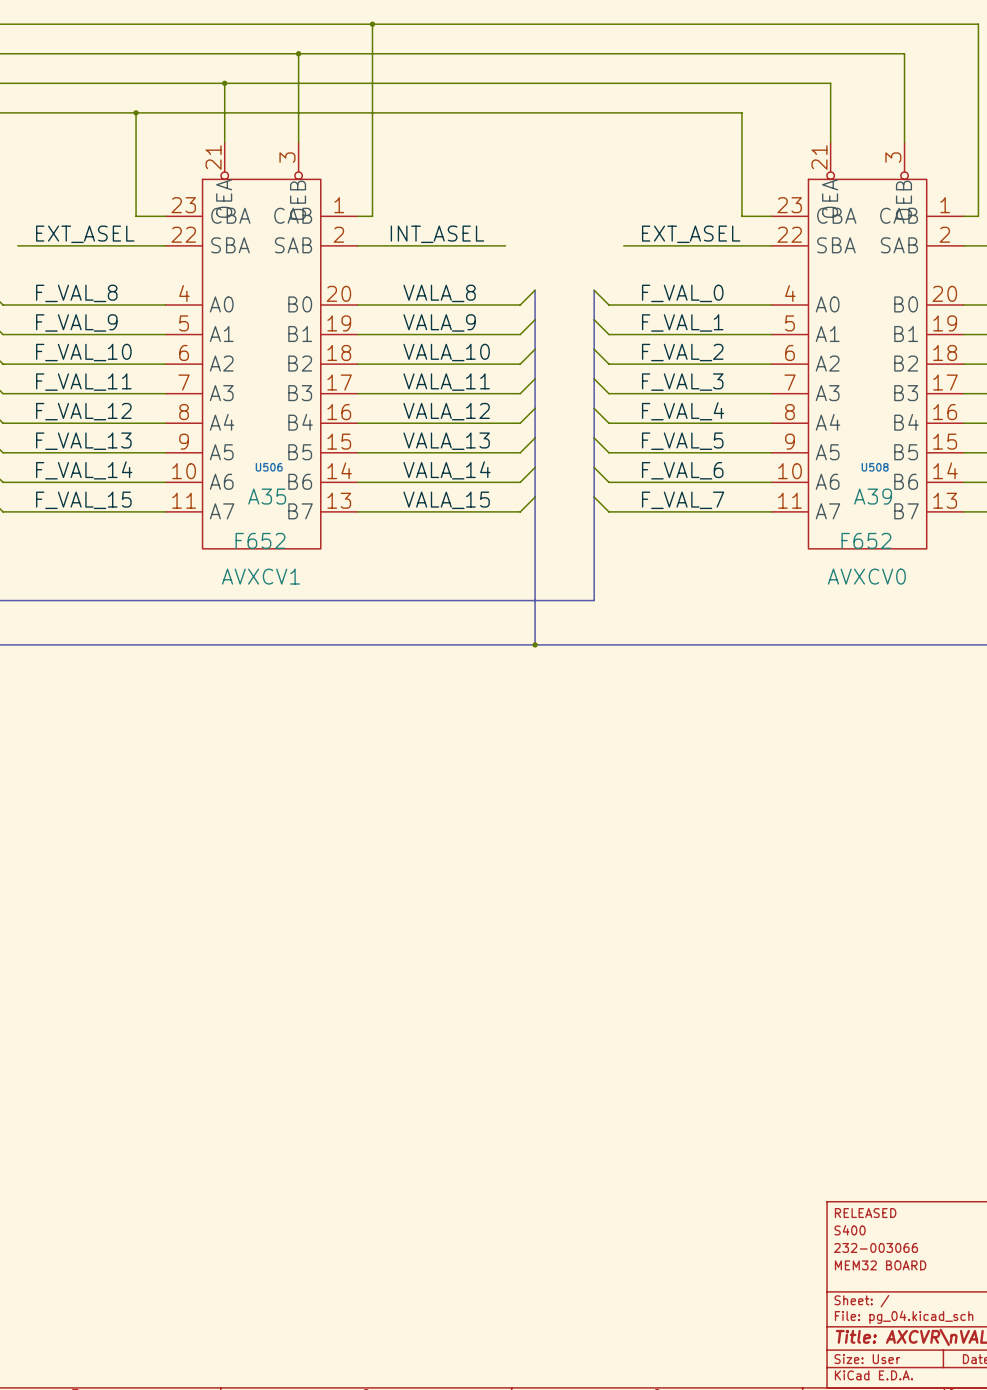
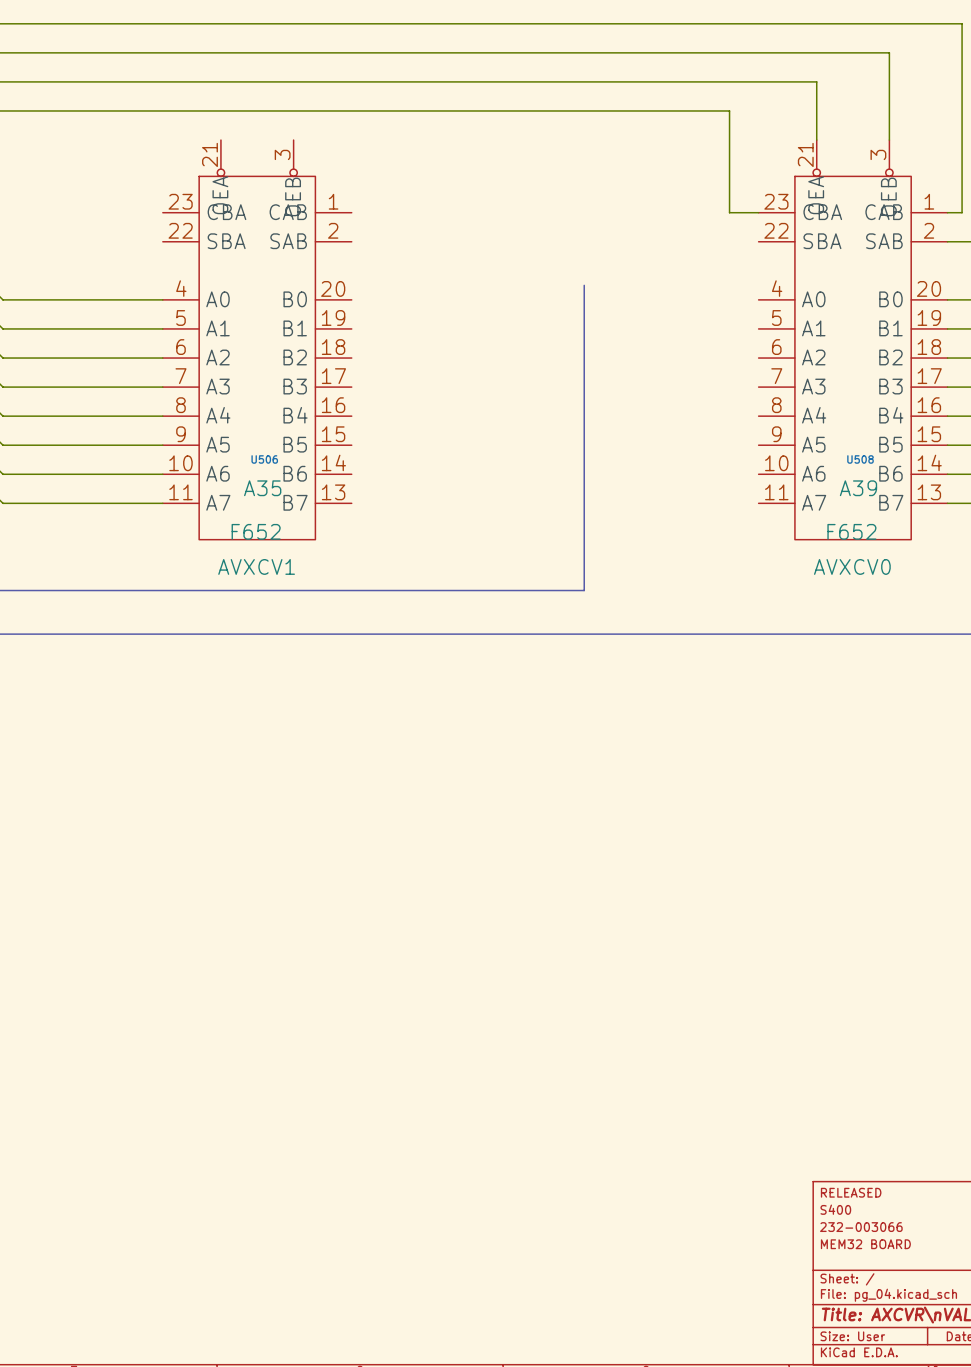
wire: (372, 24) (372, 216) (357, 216) -> none
junction: (372, 24) -> none
wire: (298, 53) (298, 142) -> none
junction: (298, 53) -> none
wire: (224, 83) (224, 142) -> none
junction: (224, 83) -> none
wire: (136, 112) (136, 216) (165, 216) -> none
junction: (136, 112) -> none
label: EXT_ASEL (85, 234) -> none
label: INT_ASEL (437, 234) -> none
label: EXT_ASEL (691, 234) -> none
wire: (17, 245) (165, 245) -> none
wire: (357, 245) (505, 245) -> none
wire: (623, 245) (771, 245) -> none
bus: (535, 290) (535, 644) -> none
wire: (535, 290) (520, 305) (357, 305) -> none
wire: (594, 290) (608, 305) (771, 305) -> none
label: F_VAL_8 (76, 293) -> none
label: VALA_8 (439, 293) -> none
label: F_VAL_0 (682, 293) -> none
wire: (535, 319) (520, 334) (357, 334) -> none
wire: (594, 319) (608, 334) (771, 334) -> none
label: F_VAL_9 (76, 322) -> none
label: VALA_9 (439, 322) -> none
label: F_VAL_1 (682, 322) -> none
wire: (535, 349) (520, 364) (357, 364) -> none
wire: (594, 349) (608, 364) (771, 364) -> none
label: F_VAL_10 (83, 352) -> none
label: VALA_10 (446, 352) -> none
label: F_VAL_2 (682, 352) -> none
wire: (535, 378) (520, 393) (357, 393) -> none
wire: (594, 378) (608, 393) (771, 393) -> none
label: F_VAL_11 (83, 382) -> none
label: VALA_11 (446, 382) -> none
label: F_VAL_3 (682, 382) -> none
wire: (535, 408) (520, 423) (357, 423) -> none
wire: (594, 408) (608, 423) (771, 423) -> none
label: F_VAL_12 (83, 411) -> none
label: VALA_12 (446, 411) -> none
label: F_VAL_4 (683, 411) -> none
wire: (535, 438) (520, 452) (357, 452) -> none
wire: (594, 438) (608, 452) (771, 452) -> none
label: F_VAL_13 (83, 441) -> none
label: VALA_13 (446, 441) -> none
label: F_VAL_5 (682, 441) -> none
wire: (535, 467) (520, 482) (357, 482) -> none
wire: (594, 467) (608, 482) (771, 482) -> none
label: F_VAL_14 (84, 470) -> none
label: VALA_14 (446, 470) -> none
label: F_VAL_6 (682, 470) -> none
wire: (535, 497) (520, 511) (357, 511) -> none
wire: (594, 497) (608, 511) (771, 511) -> none
label: F_VAL_15 (83, 500) -> none
label: VALA_15 (446, 500) -> none
label: F_VAL_7 (683, 500) -> none
junction: (535, 644) -> none

